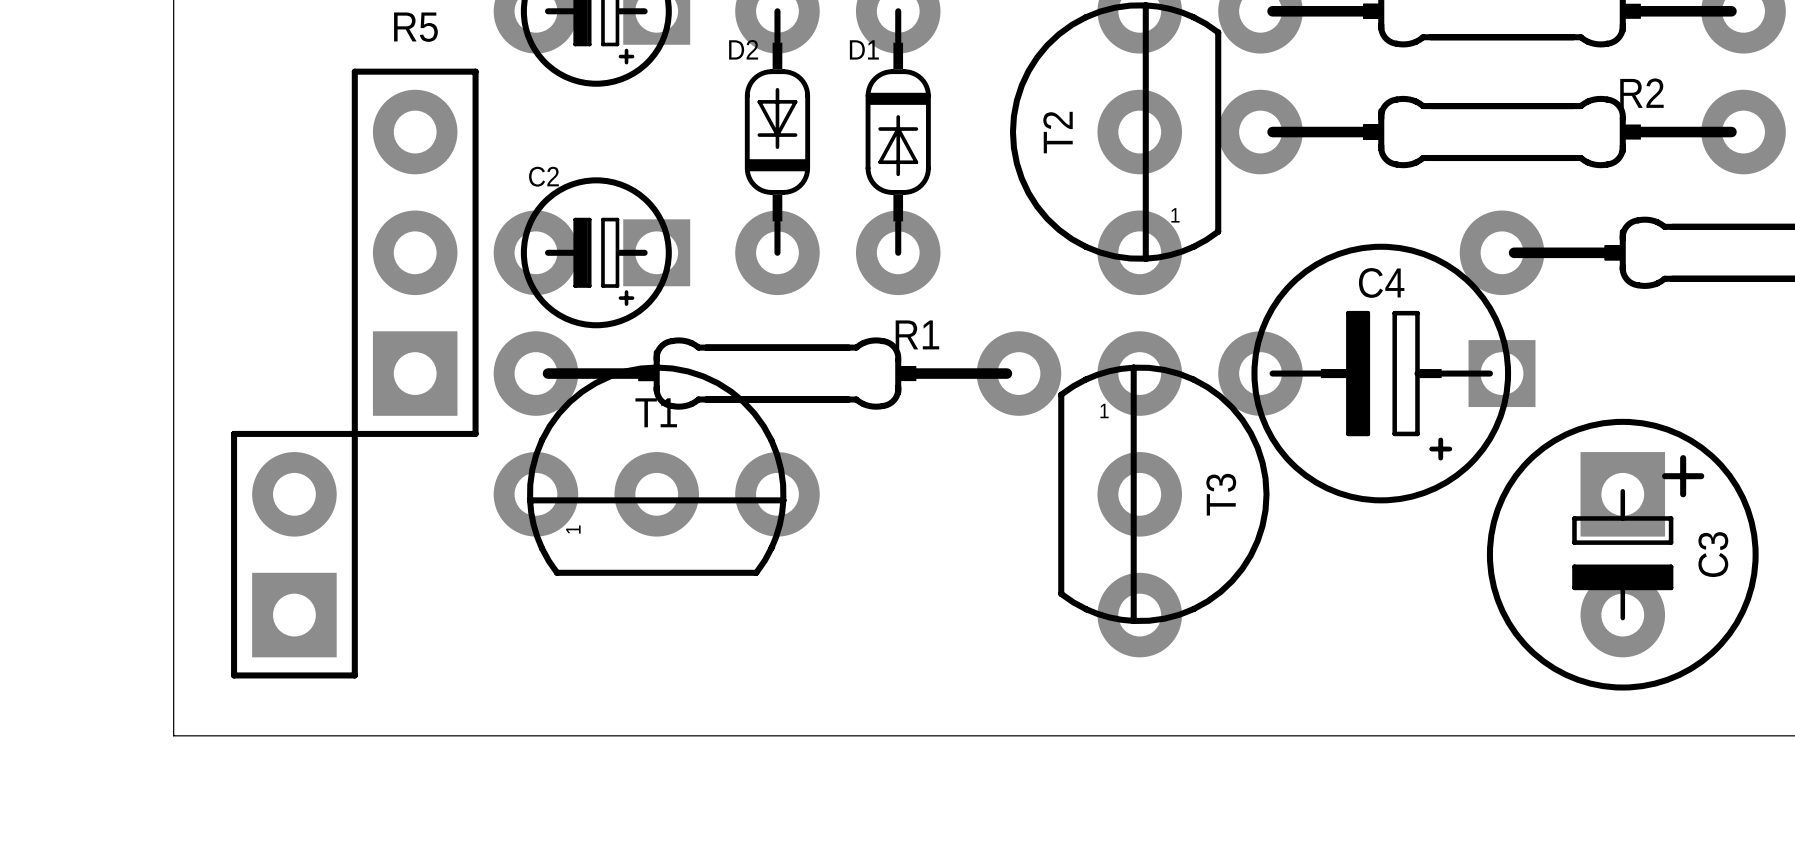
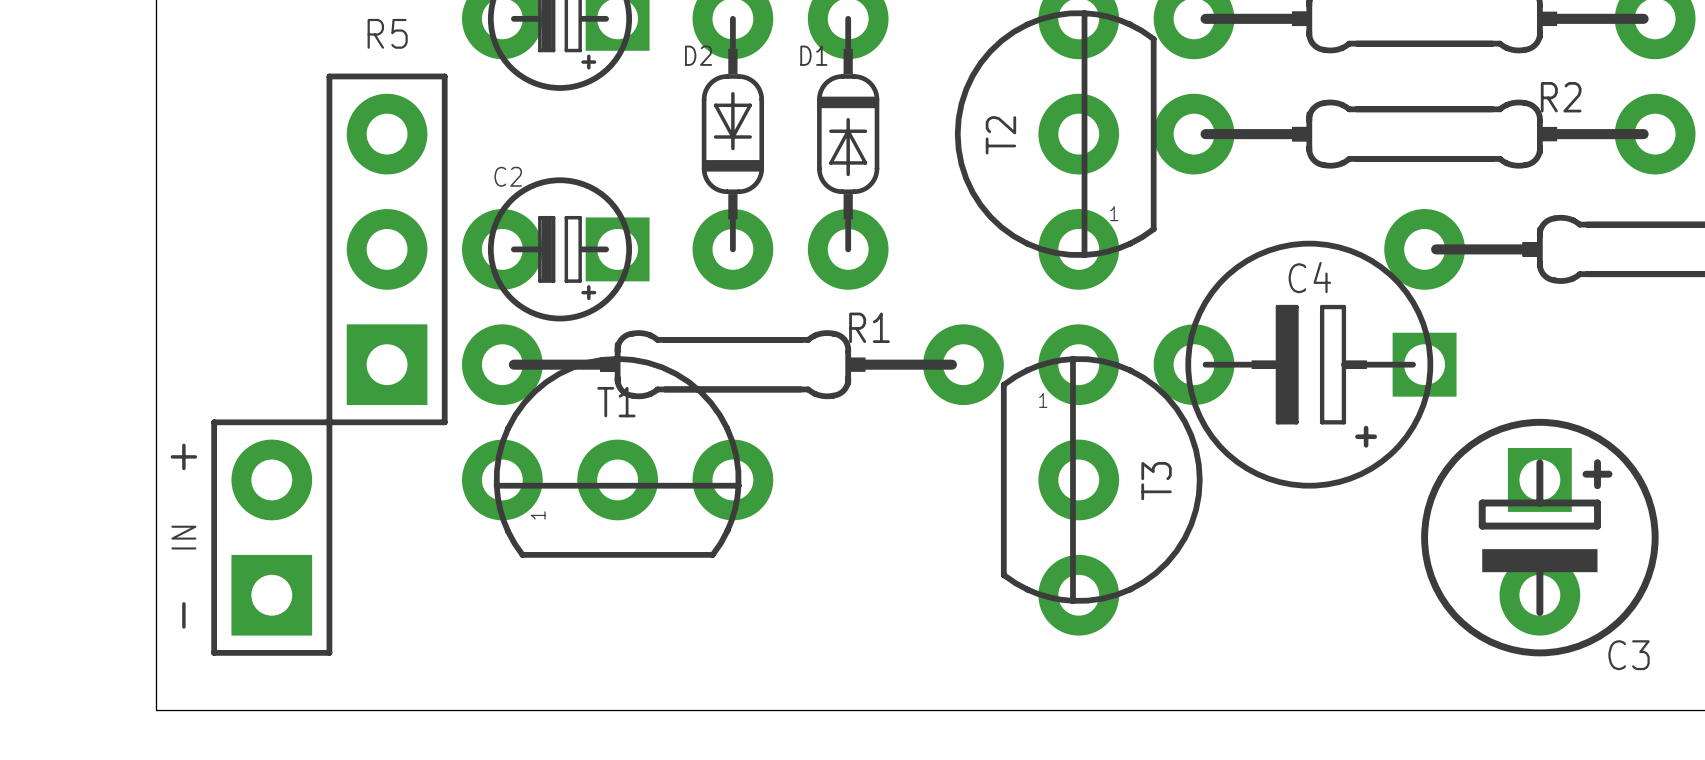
C3 footprint: [1486, 418, 1759, 691] -> [1421, 418, 1659, 657]
IN: none -> (251, 537)
C3 name rotation: 0° (1713, 554) -> 90° clockwise (1629, 655)
C3 name position: C3 (1713, 554) -> C3 (1629, 655)

